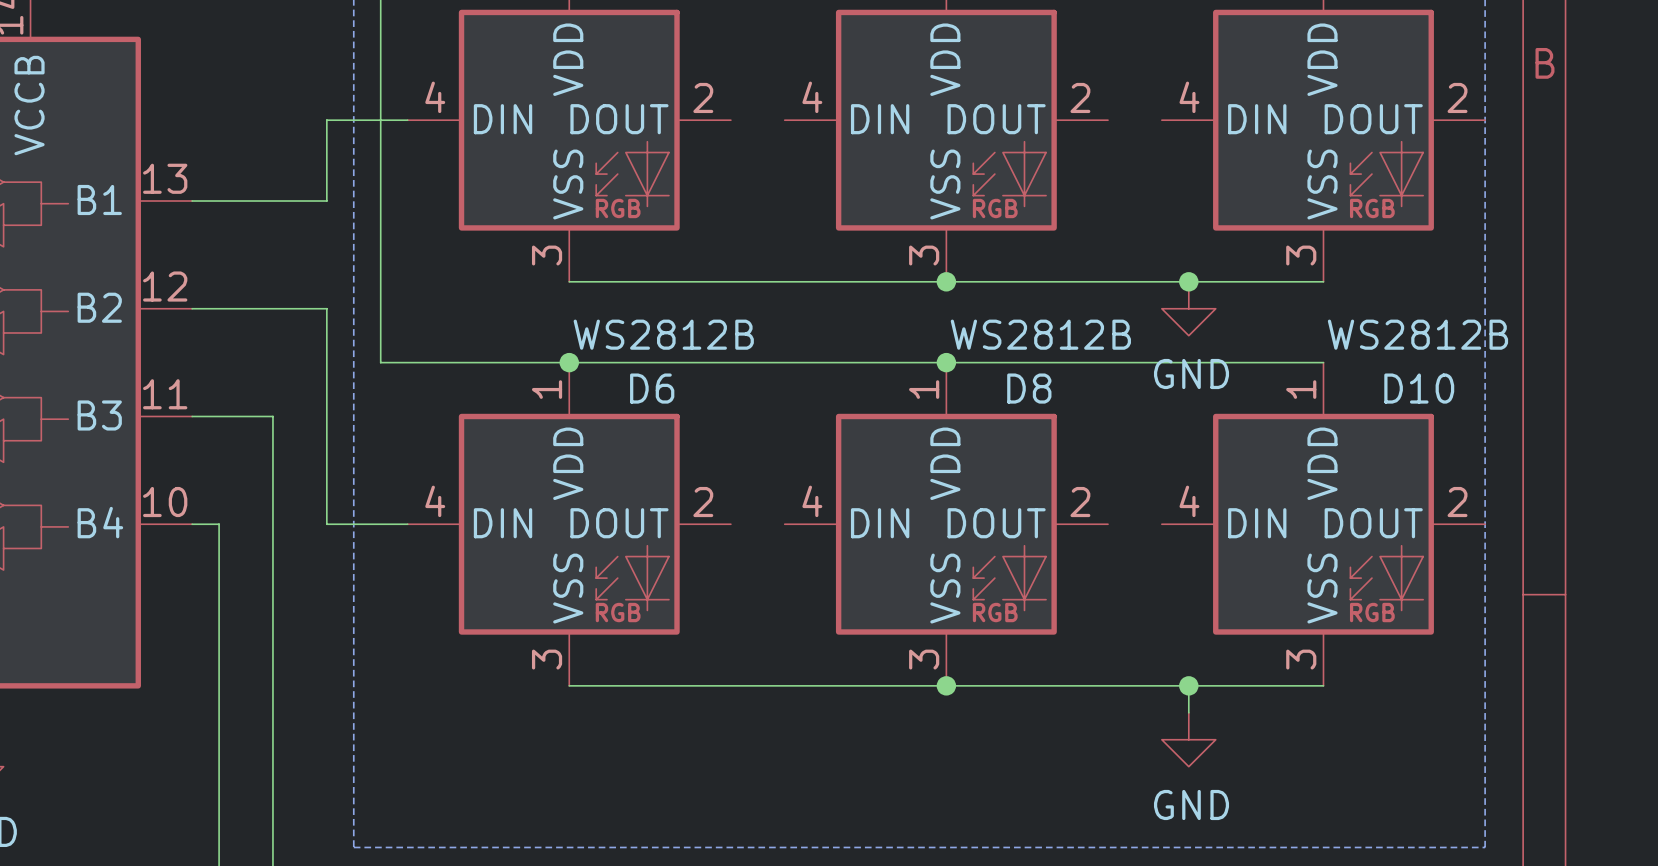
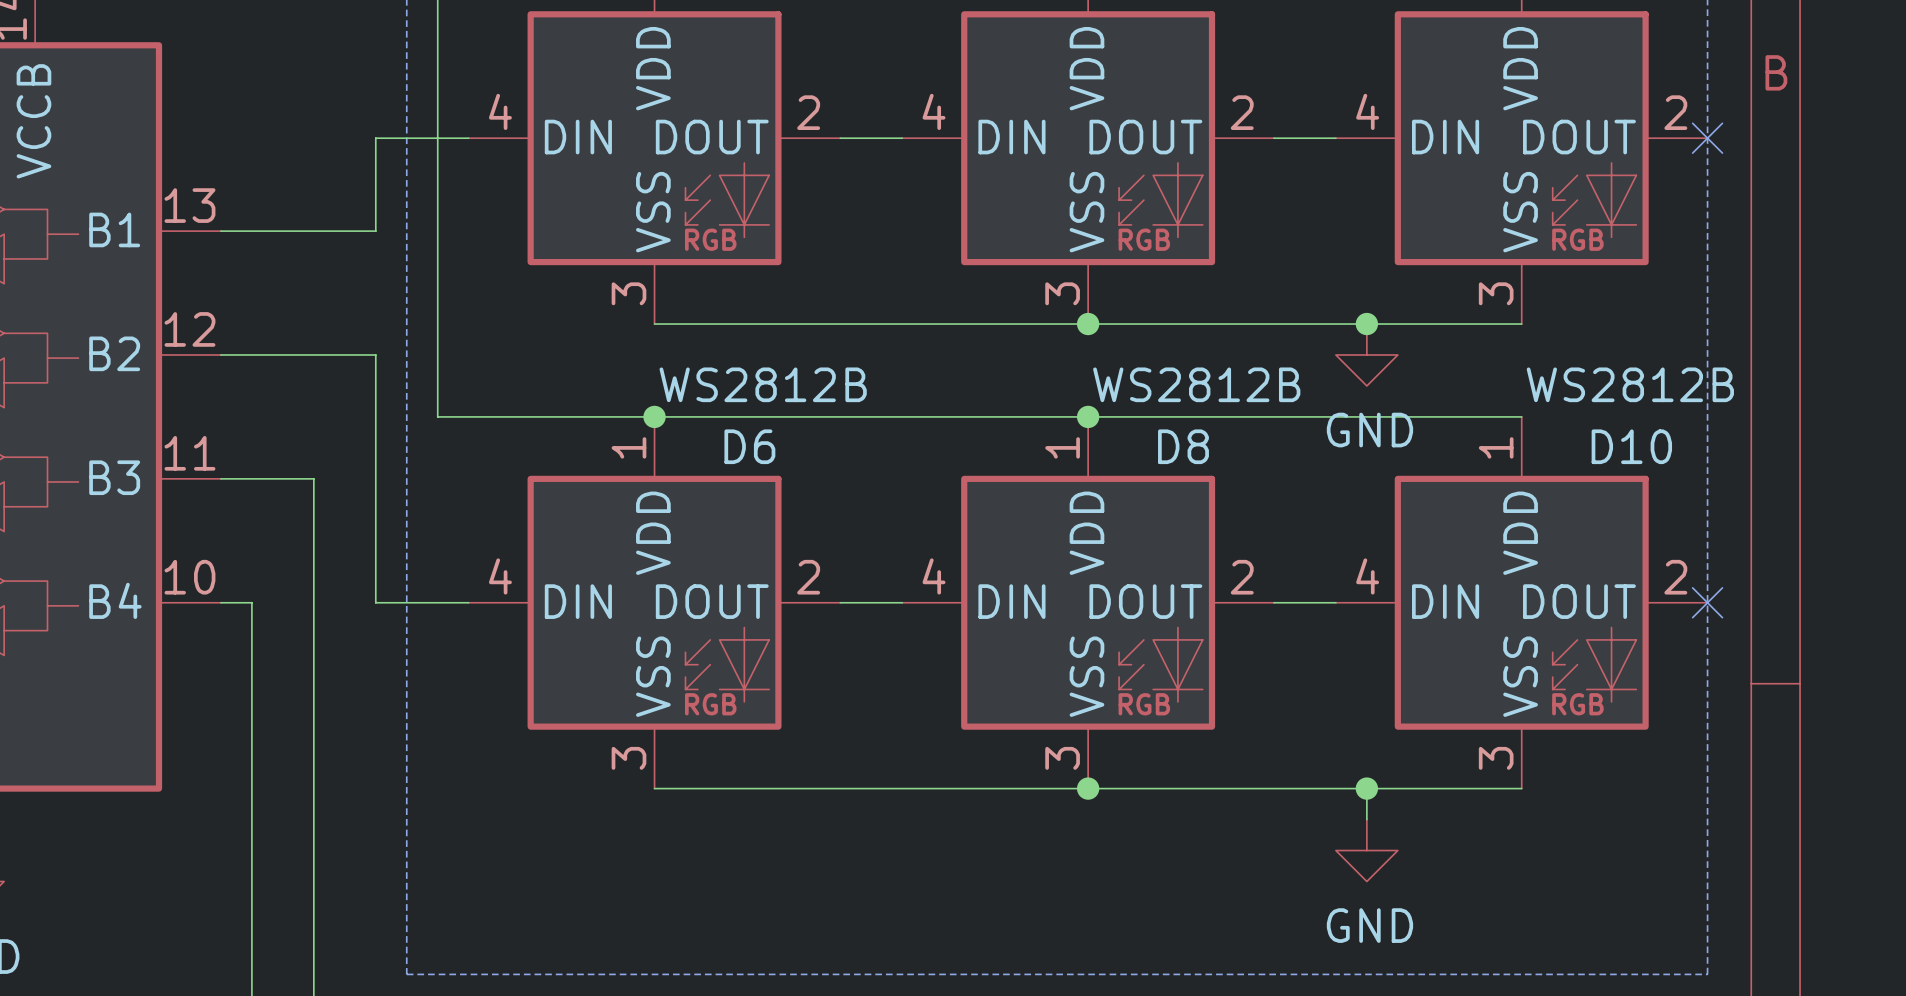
wire: none -> (840, 138) (902, 138)
wire: none -> (1273, 138) (1335, 138)
no-connect mark: none -> (1707, 138)
wire: none -> (840, 602) (902, 602)
wire: none -> (1273, 602) (1335, 602)
no-connect mark: none -> (1707, 602)

